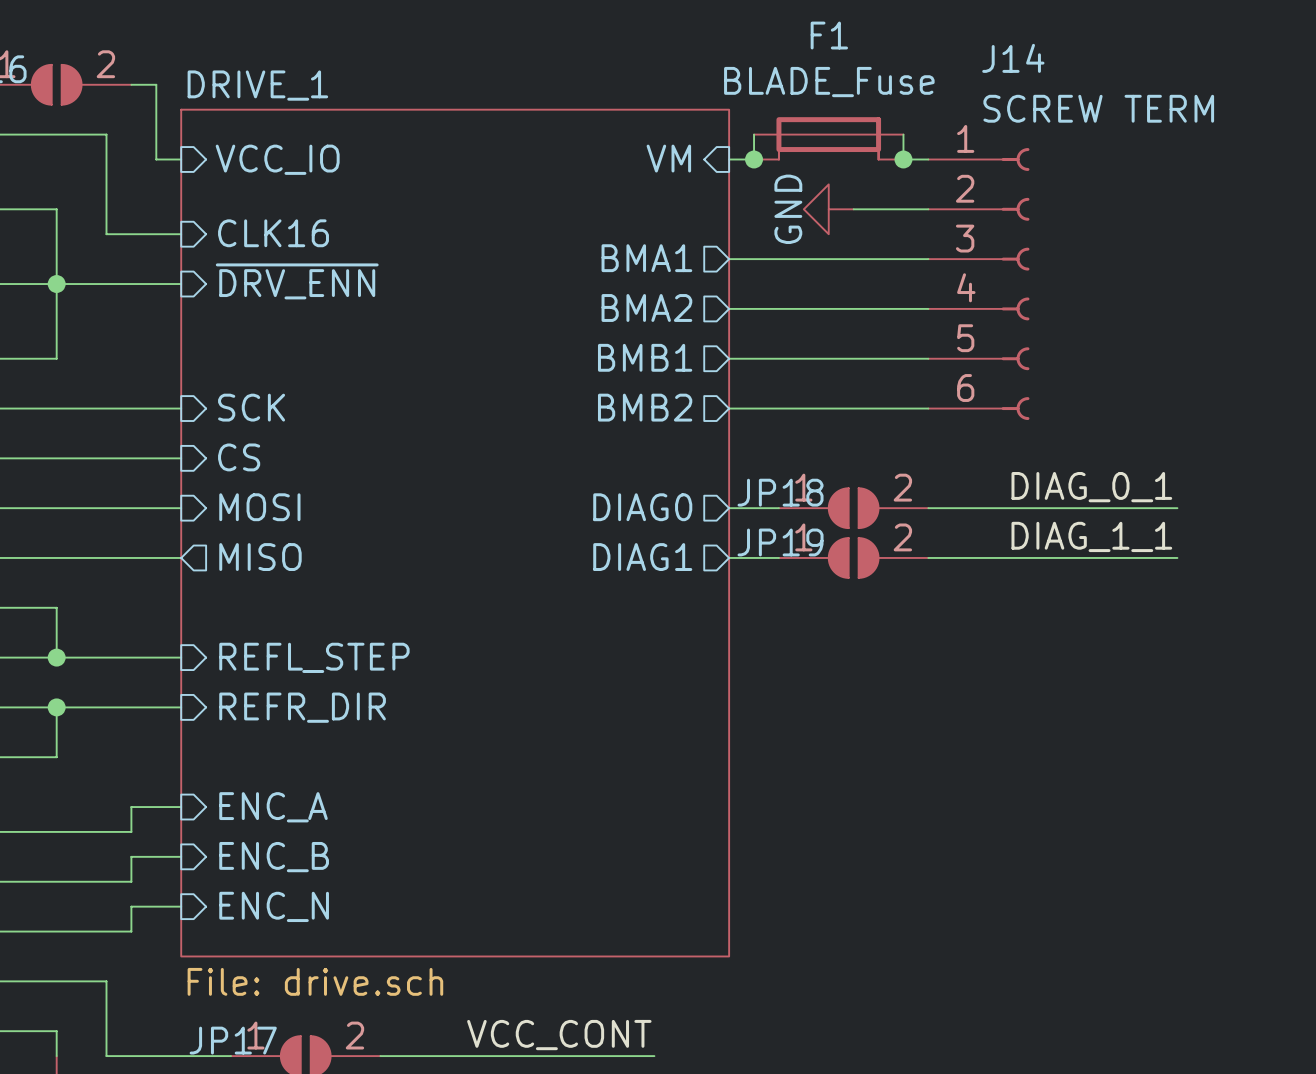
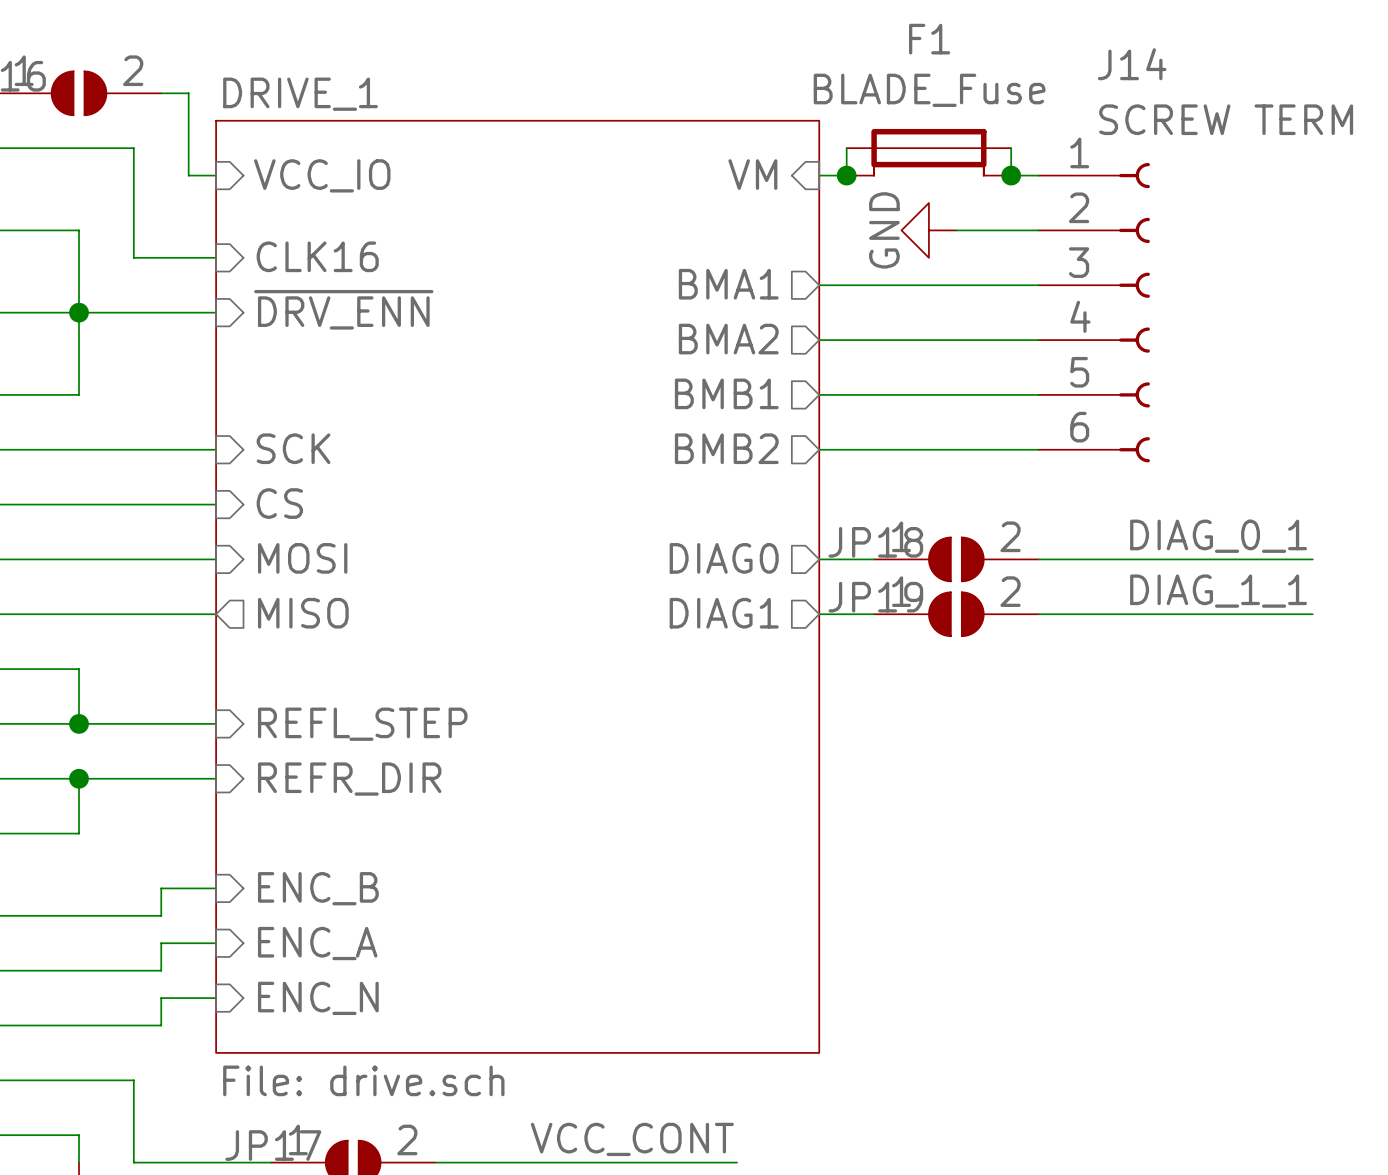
sheet pin: ENC_A (273, 807) -> ENC_B (318, 888)
sheet pin: ENC_B (274, 857) -> ENC_A (317, 943)

